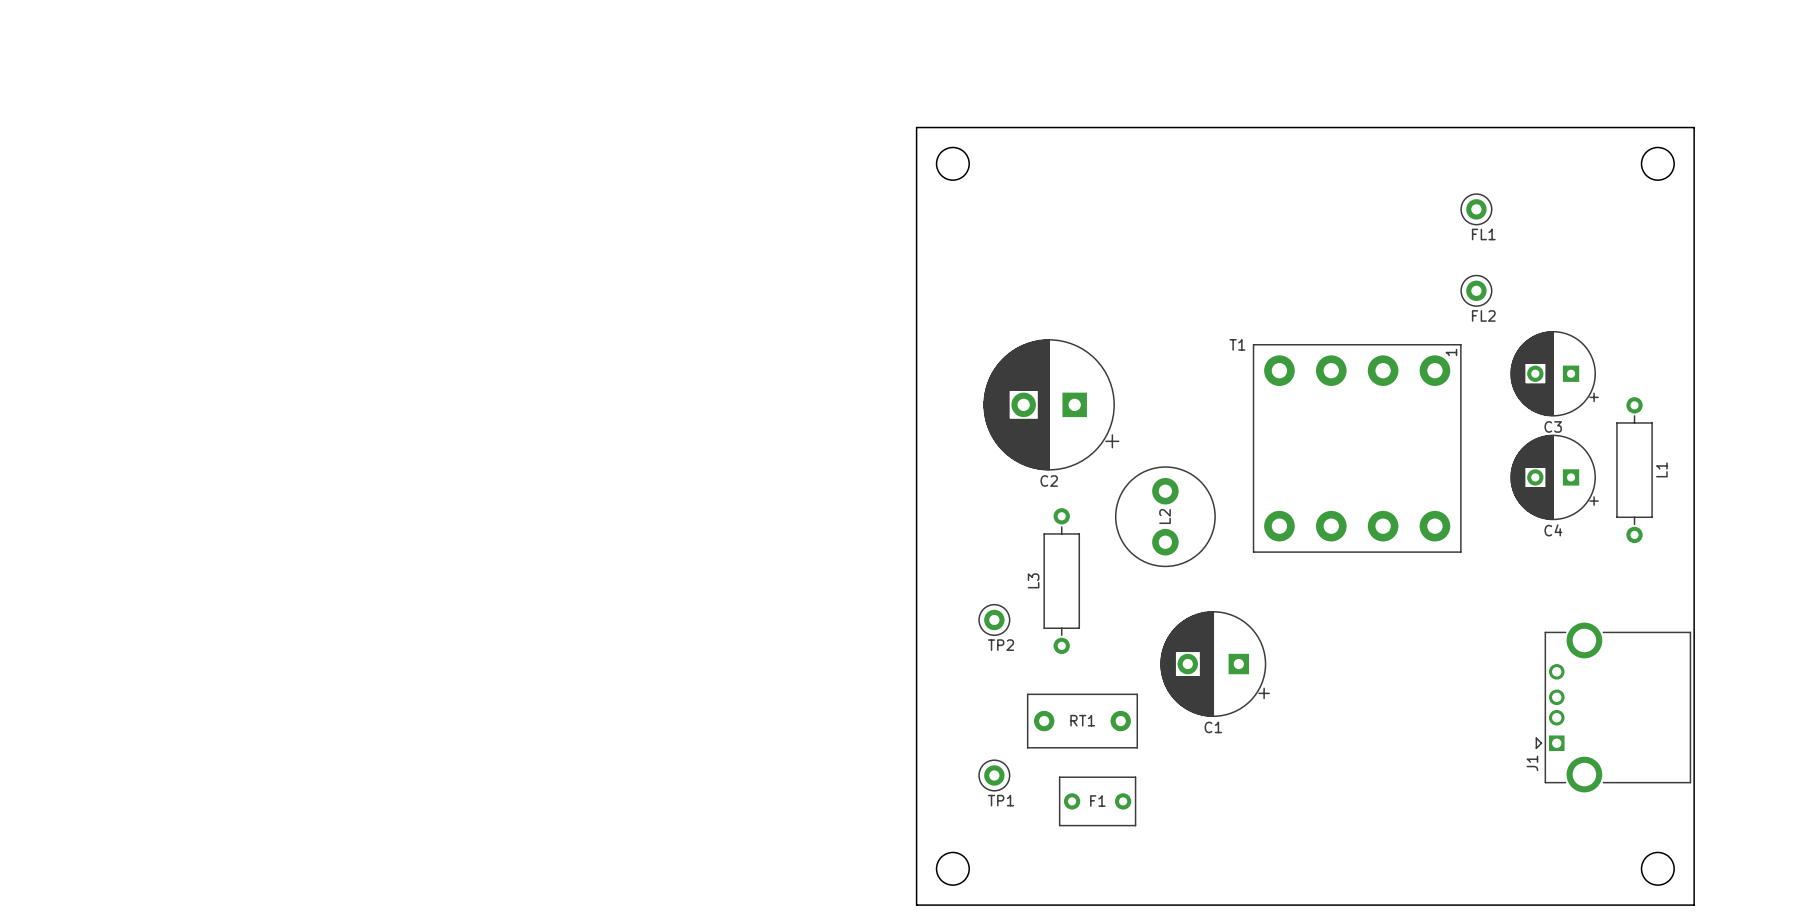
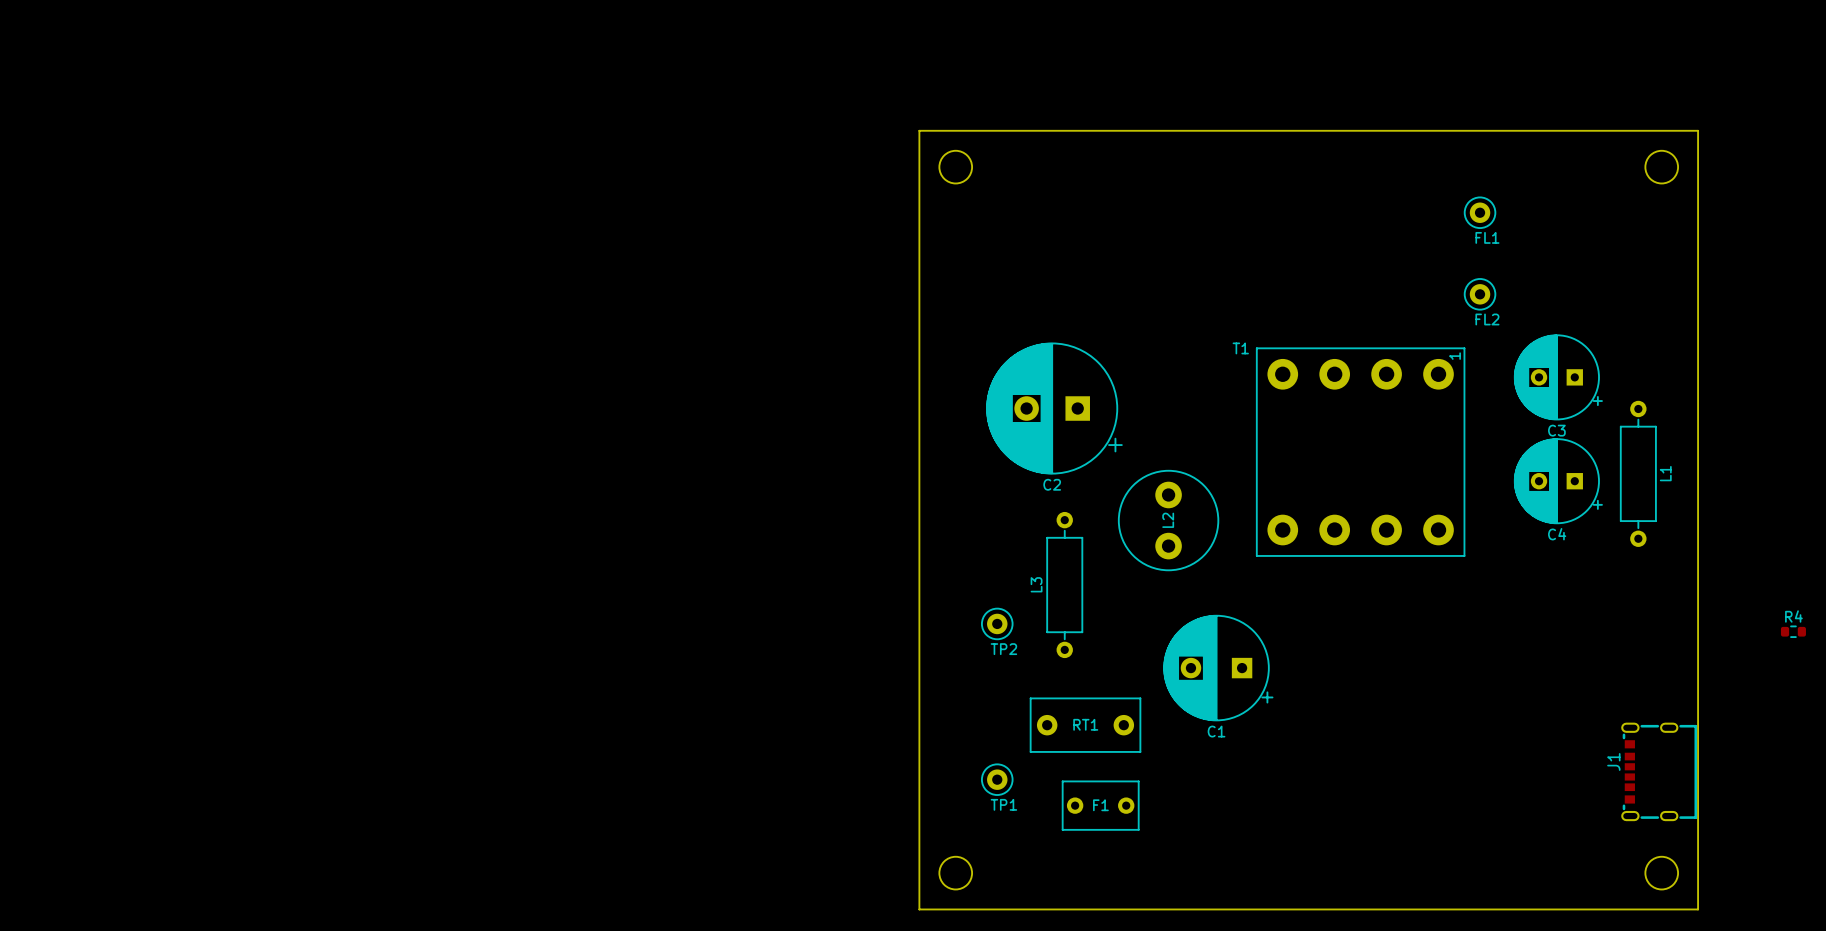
J1 footprint: [1535, 622, 1692, 793] -> [1621, 722, 1698, 822]
R4: none -> (1793, 631)
J1 name position: J1 (1532, 763) -> J1 (1613, 761)

